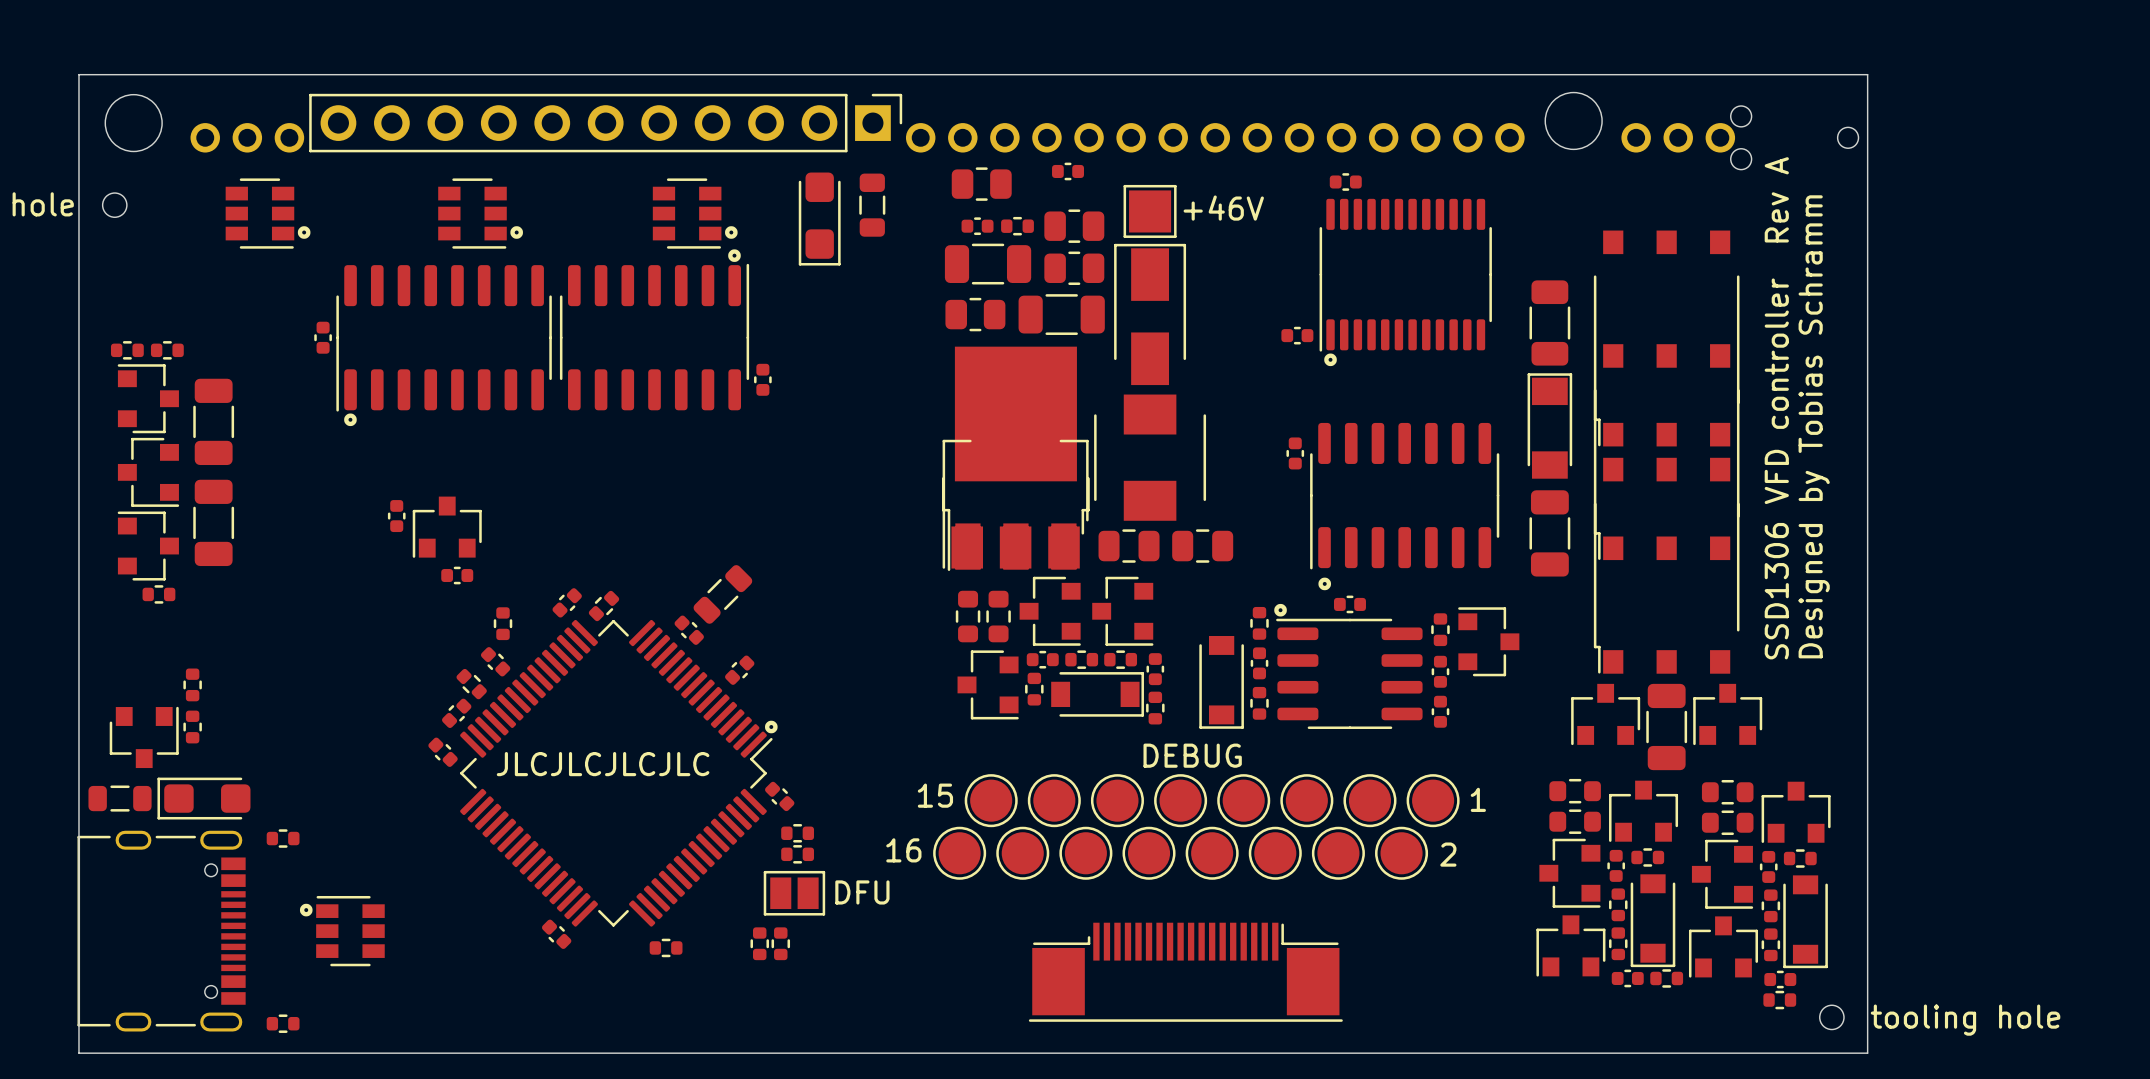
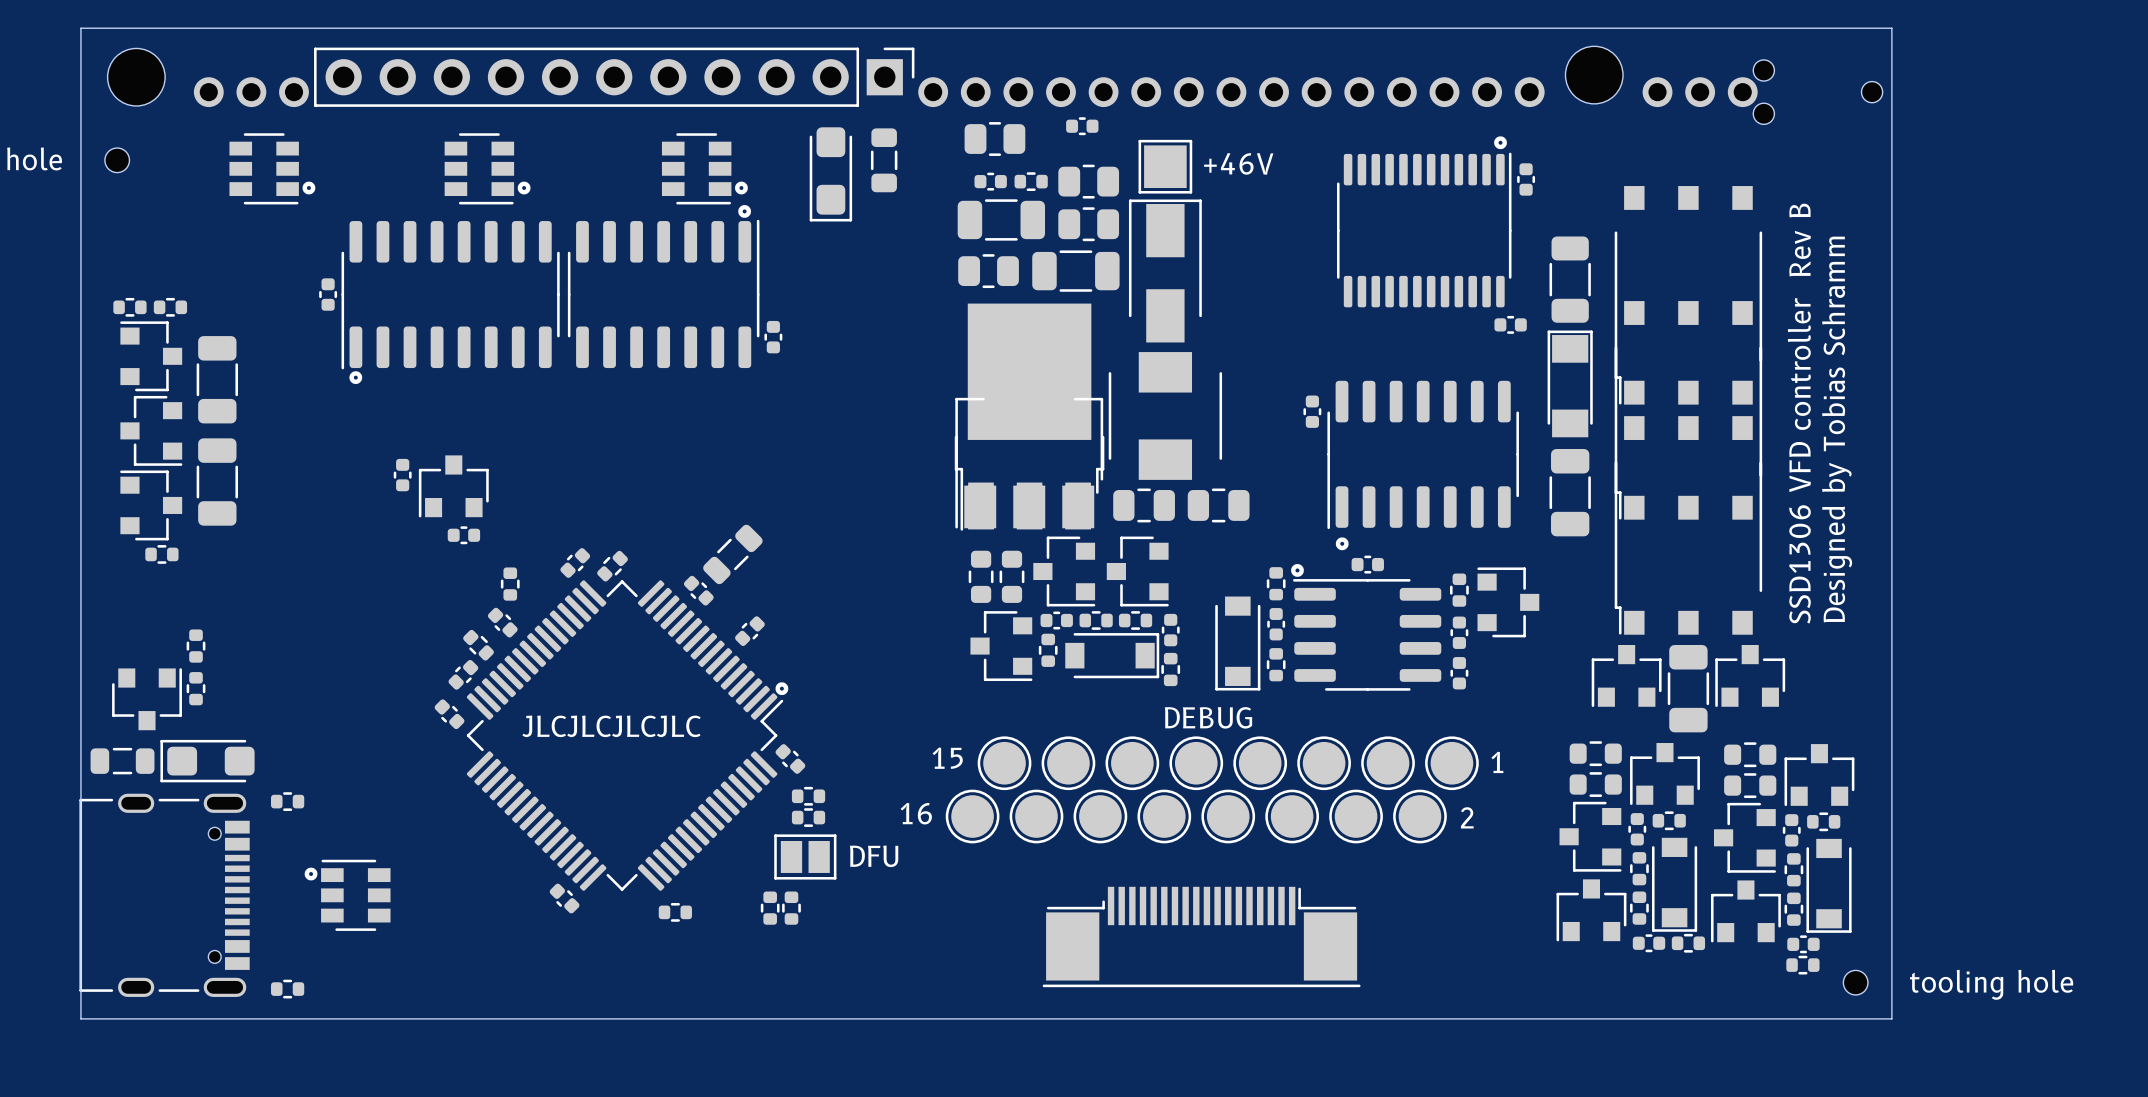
part: (1345, 181) -> none
part: none -> (1526, 179)
part rotation: 0° (1405, 275) -> 180° (1424, 229)
part: (1297, 335) -> none
drawing position: (1330, 359) -> (1500, 142)
part: none -> (1510, 324)
text: SSD1306 VFD controller Rev A (1776, 408) -> SSD1306 VFD controller Rev B (1799, 413)

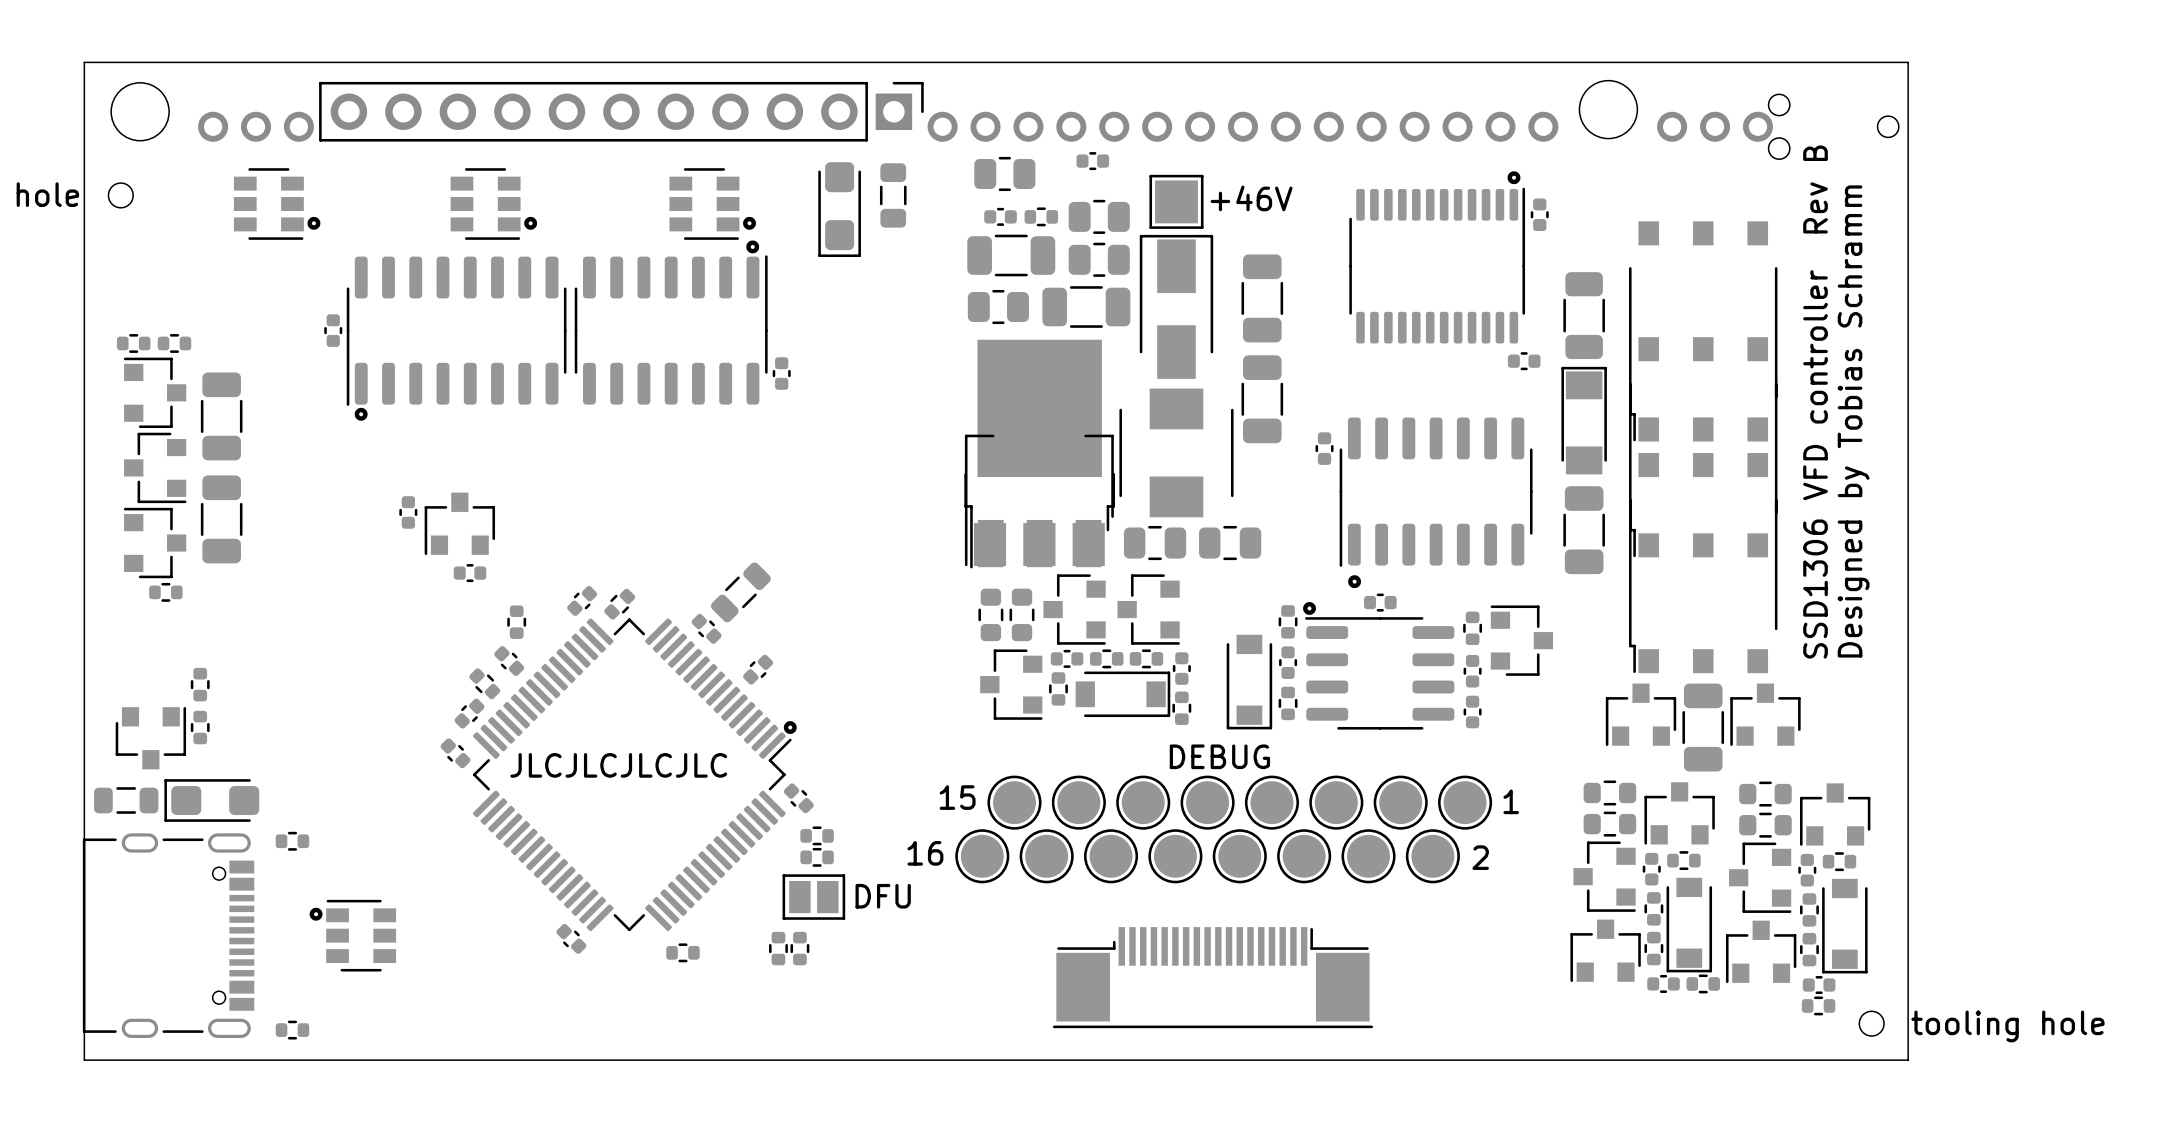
part: none -> (1262, 298)
part: none -> (1262, 399)

